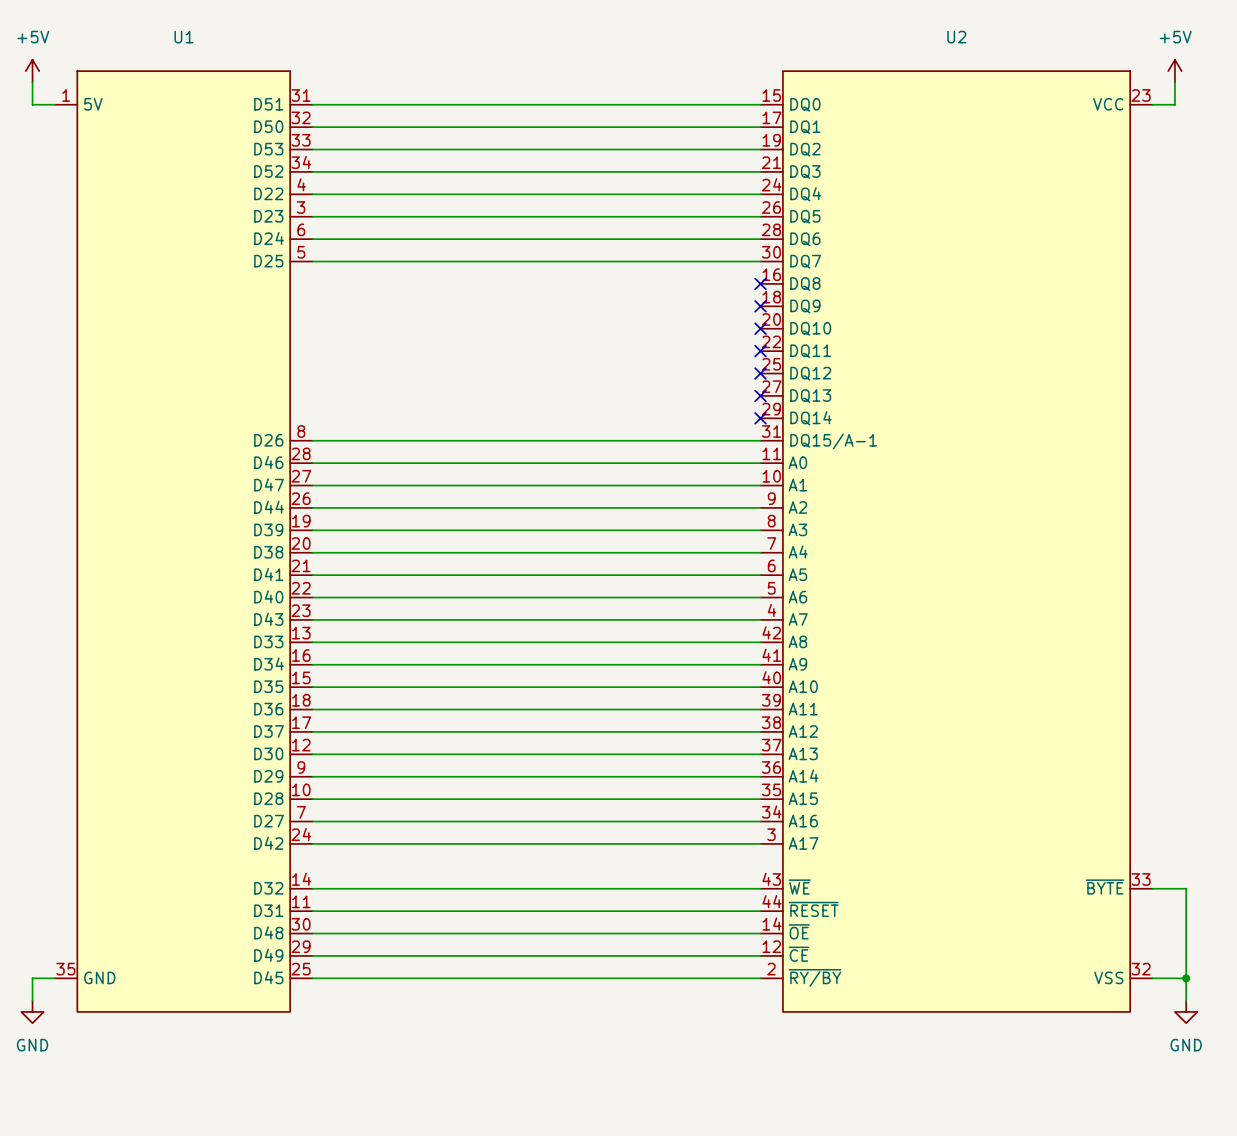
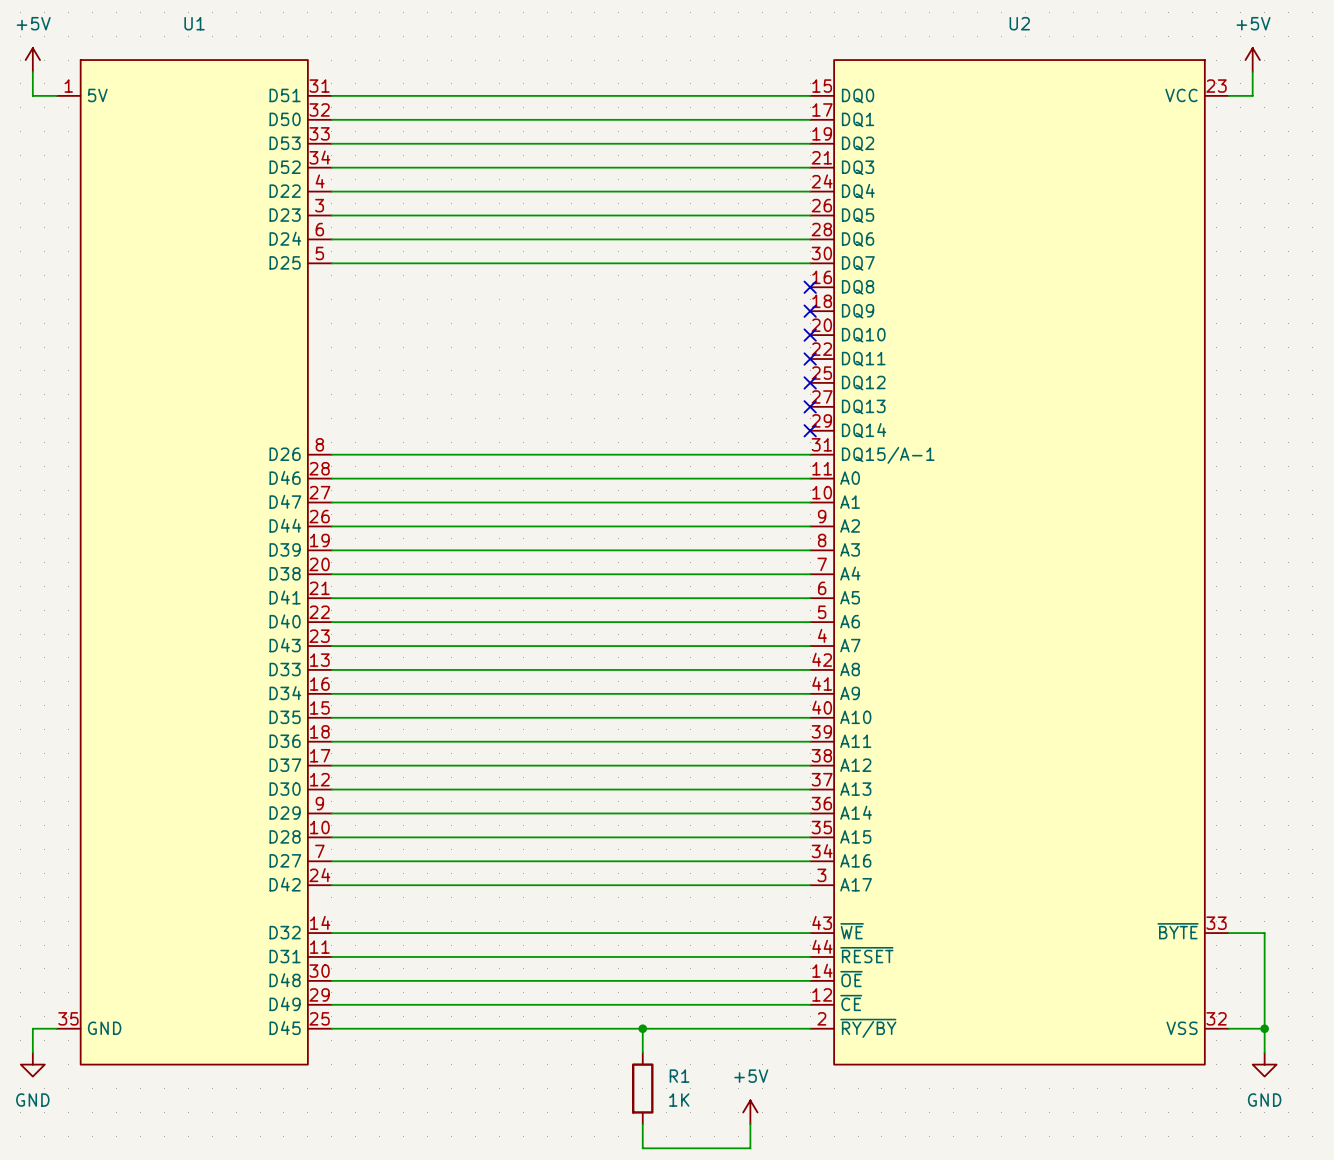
wire: none -> (642, 1028) (642, 1052)
junction: none -> (642, 1028)
R1: none -> 1K (642, 1088)
power symbol: none -> +5V (750, 1112)
wire: none -> (642, 1124) (642, 1148) (750, 1148) (750, 1124)

